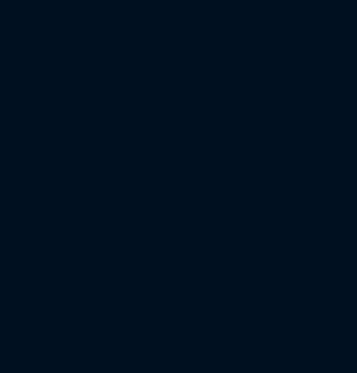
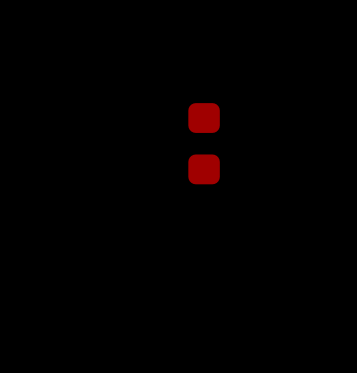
part: none -> (204, 143)

